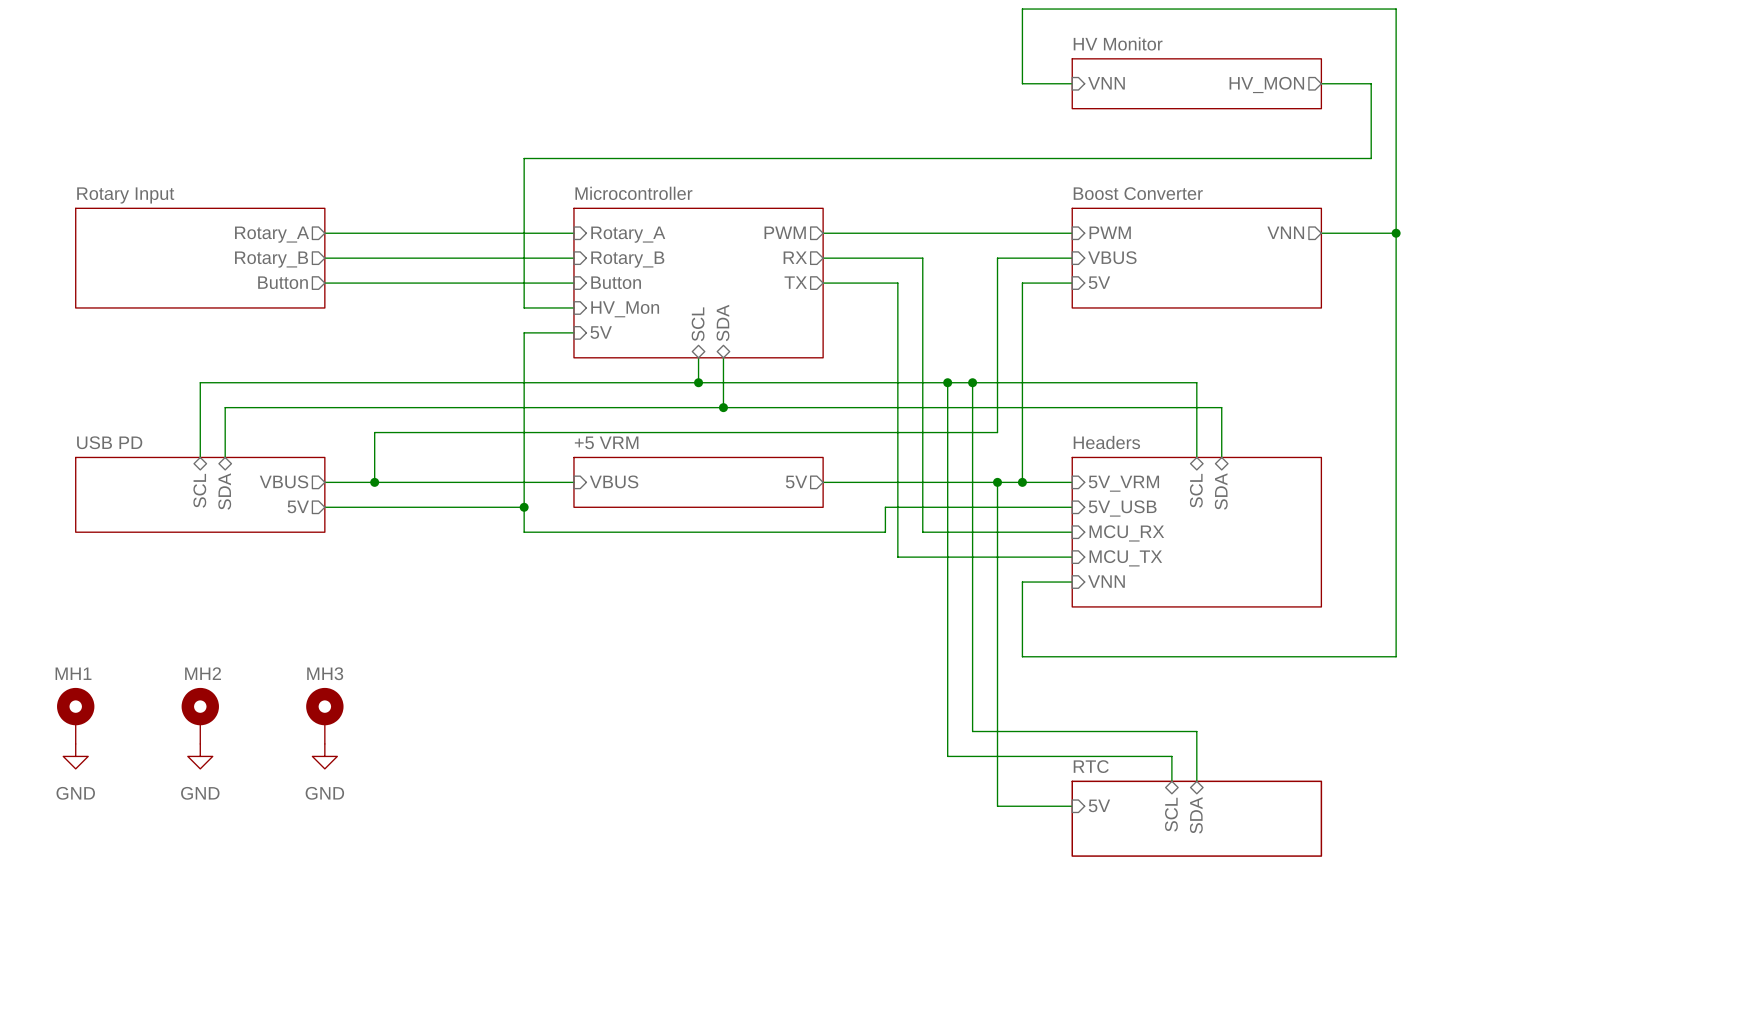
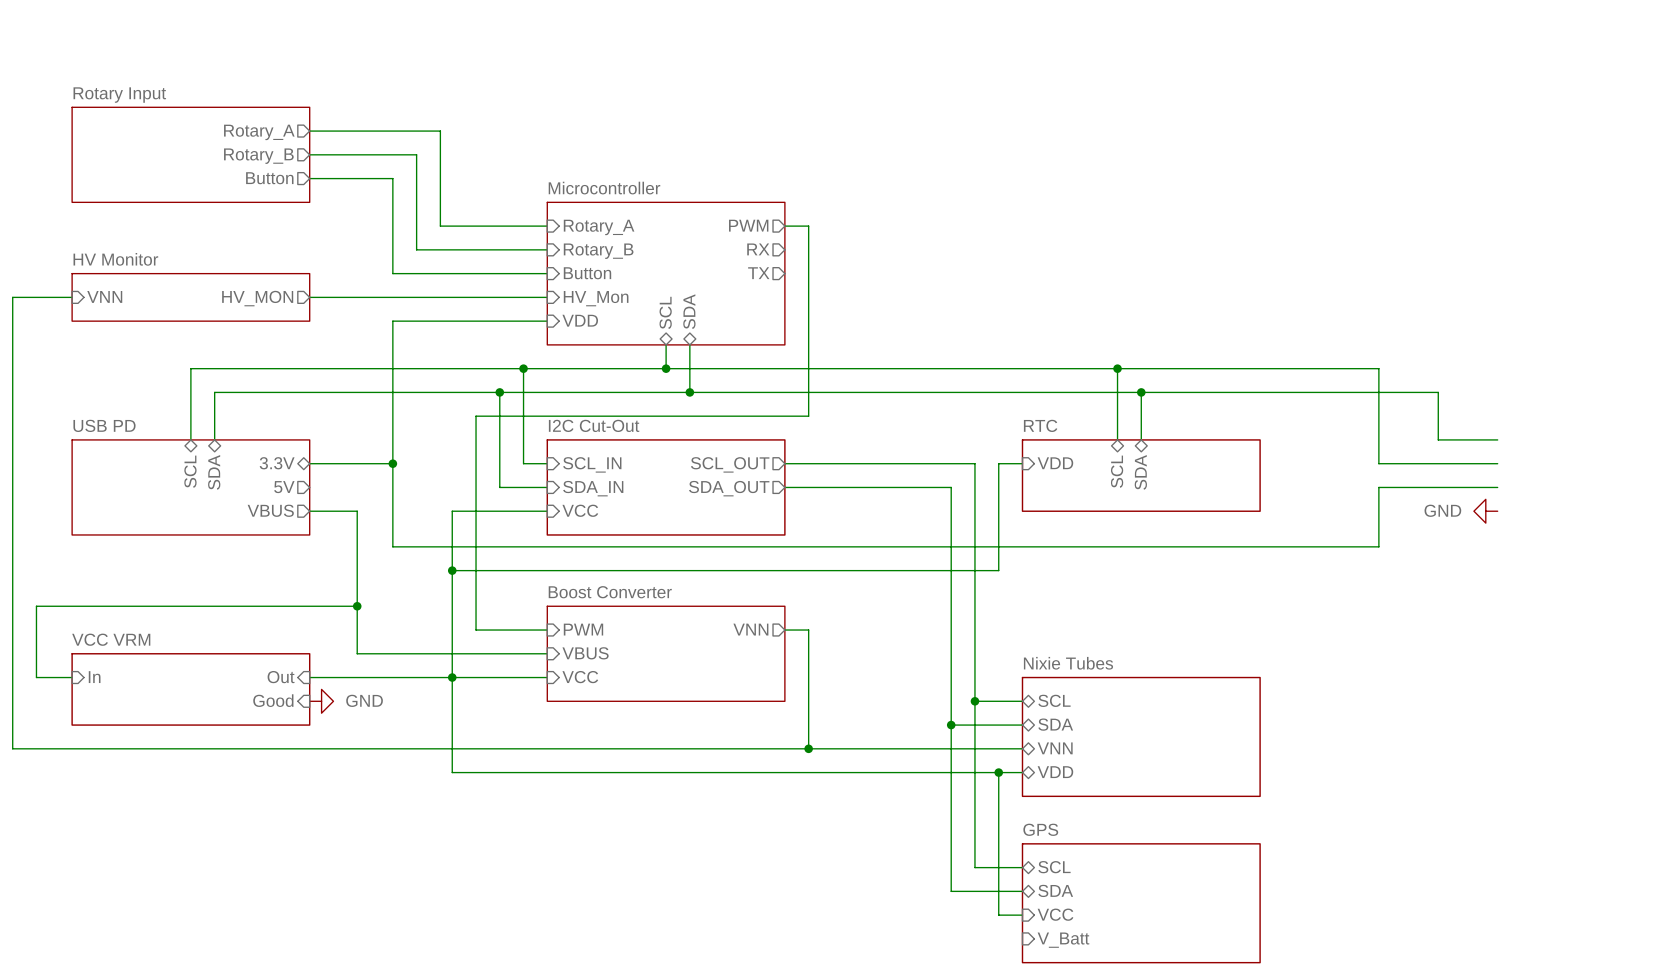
wire: (1072, 83) (1022, 83) (1022, 9) (1396, 9) (1396, 656) (1022, 656) -> (1022, 867) (974, 867) (974, 630)
sheet pin: VNN (1106, 83) -> none
sheet HV Monitor: (1196, 83) -> none
wire: (1321, 83) (1371, 83) (1371, 158) (524, 158) (524, 307) -> (309, 297) (499, 297)
sheet pin: HV_MON (1266, 85) -> none
sheet pin: PWM (1110, 232) -> none
sheet pin: VNN (1285, 232) -> none
wire: (324, 233) (461, 233) -> (309, 131) (440, 131) (440, 226)
wire: (848, 233) (1072, 233) -> none
wire: (1321, 233) (1396, 233) -> none
junction: (1396, 233) -> none
sheet pin position: Rotary_A (272, 234) -> Rotary_A (259, 132)
sheet pin: VBUS (1112, 257) -> none
sheet Rotary Input position: (200, 258) -> (190, 154)
wire: (324, 258) (436, 258) -> (309, 154) (416, 154) (416, 249)
wire: (823, 258) (922, 258) (922, 532) (1072, 532) -> none
wire: (1072, 258) (997, 258) (997, 432) (848, 432) -> (808, 226) (808, 416)
sheet Boost Converter: (1196, 258) -> none
sheet pin position: Rotary_B (271, 259) -> Rotary_B (258, 156)
sheet pin position: Button (283, 282) -> Button (269, 178)
sheet pin: 5V (1099, 282) -> none
wire: (324, 283) (412, 283) -> (309, 178) (392, 178) (392, 273)
wire: (823, 283) (897, 283) (897, 557) (1072, 557) -> none
wire: (1072, 283) (1022, 283) (1022, 482) (1047, 482) -> (452, 570) (998, 570) (998, 463)
wire: none -> (72, 297) (12, 297) (12, 748) (1022, 748)
sheet pin: none -> VNN (104, 296)
sheet HV Monitor: none -> (190, 297)
sheet pin: none -> HV_MON (257, 298)
wire: (524, 332) (524, 407) -> (499, 321) (392, 321) (392, 546) (1378, 546) (1378, 487) (1497, 487)
sheet pin: 5V (601, 332) -> VDD (580, 320)
junction: none -> (523, 368)
wire: (947, 382) (947, 756) (997, 756) -> none
junction: (947, 382) -> none
wire: (972, 382) (972, 731) (1022, 731) -> none
junction: (972, 382) -> none
wire: none -> (1117, 368) (1117, 439)
junction: none -> (1117, 368)
wire: (1196, 382) (1196, 407) -> (1141, 368) (1378, 368) (1378, 463) (1497, 463)
junction: none -> (499, 392)
junction: none -> (1141, 392)
wire: (1221, 407) (1221, 457) -> (1165, 392) (1438, 392) (1438, 439) (1497, 439)
wire: (499, 432) (374, 432) (374, 482) -> (476, 416) (476, 630) (547, 630)
sheet pin shape: output (284, 481) -> bidirectional (277, 463)
sheet pin: VBUS (284, 481) -> 3.3V (277, 463)
sheet pin: VBUS (614, 481) -> SCL_IN (592, 464)
junction position: (374, 482) -> (392, 463)
wire: (412, 482) (549, 482) -> (523, 368) (523, 463)
sheet +5 VRM: (698, 482) -> none
sheet pin: 5V (796, 482) -> SCL_OUT (730, 464)
wire: (997, 482) (997, 507) (1072, 507) -> none
junction: (997, 482) -> none
junction: (1022, 482) -> none
sheet pin: 5V_VRM (1123, 483) -> VDD (1055, 463)
sheet pin: none -> SCL (1117, 471)
sheet pin: SCL (1196, 490) -> SDA (1140, 472)
sheet pin: SDA (1221, 491) -> none
sheet USB PD: (200, 494) -> none
sheet RTC: none -> (1141, 475)
sheet USB PD: none -> (190, 487)
wire: (324, 507) (524, 507) (524, 532) -> (1022, 891) (951, 891) (951, 772) (452, 772) (452, 511) (499, 511)
wire: none -> (499, 487) (547, 487)
junction: (524, 507) -> none
sheet I2C Cut-Out: none -> (666, 487)
wire: (885, 507) (885, 532) (573, 532) -> (844, 487) (784, 487)
sheet pin: none -> SDA_IN (593, 488)
sheet pin: none -> SDA_OUT (729, 488)
sheet pin: 5V_USB (1122, 508) -> none
sheet pin: none -> VBUS (270, 510)
sheet pin: none -> VCC (580, 510)
wire: none -> (309, 511) (357, 511) (357, 653) (547, 653)
sheet Headers: (1196, 532) -> none
power symbol: none -> GND (1485, 511)
sheet pin: MCU_RX (1126, 533) -> none
sheet pin: MCU_TX (1125, 558) -> none
sheet pin: VNN (1106, 581) -> none
wire: (1022, 582) (1072, 582) -> (974, 558) (974, 463)
junction: none -> (452, 570)
wire: none -> (357, 606) (36, 606) (36, 677) (72, 677)
junction: none -> (357, 606)
sheet pin: none -> PWM (583, 629)
sheet pin: none -> VNN (750, 629)
wire: none -> (784, 630) (808, 630) (808, 748)
sheet pin: none -> VBUS (585, 653)
sheet Boost Converter: none -> (666, 653)
sheet pin: none -> In (94, 677)
sheet pin: none -> Out (281, 677)
wire: none -> (309, 677) (547, 677)
junction: none -> (452, 677)
sheet pin: none -> VCC (580, 677)
MH1: (75, 715) -> none
MH2: (200, 715) -> none
MH3: (324, 715) -> none
sheet VCC VRM: none -> (190, 689)
sheet pin: none -> Good (273, 700)
junction: none -> (974, 701)
wire: (1072, 731) (1196, 731) (1196, 781) -> none
sheet pin: none -> SCL (1054, 700)
sheet pin: none -> SDA (1055, 724)
power symbol: GND (75, 756) -> none
power symbol: GND (200, 756) -> none
power symbol rotation: 0° (324, 756) -> 90° counterclockwise (321, 701)
power symbol position: GND (324, 756) -> GND (321, 701)
junction: none -> (951, 725)
wire: (1072, 756) (1171, 756) (1171, 781) -> none
sheet Nixie Tubes: none -> (1141, 736)
sheet pin: none -> VNN (1055, 748)
junction: none -> (808, 748)
sheet pin shape: input (1099, 805) -> bidirectional (1055, 772)
sheet pin: 5V (1099, 805) -> VDD (1055, 772)
wire: none -> (998, 772) (998, 915) (1022, 915)
junction: none -> (998, 772)
sheet pin: SCL (1171, 814) -> none
sheet pin: SDA (1196, 815) -> none
sheet RTC: (1196, 818) -> none
sheet pin: none -> SCL (1054, 867)
sheet pin: none -> SDA (1055, 890)
sheet GPS: none -> (1141, 903)
sheet pin: none -> VCC (1055, 914)
sheet pin: none -> V_Batt (1063, 940)

